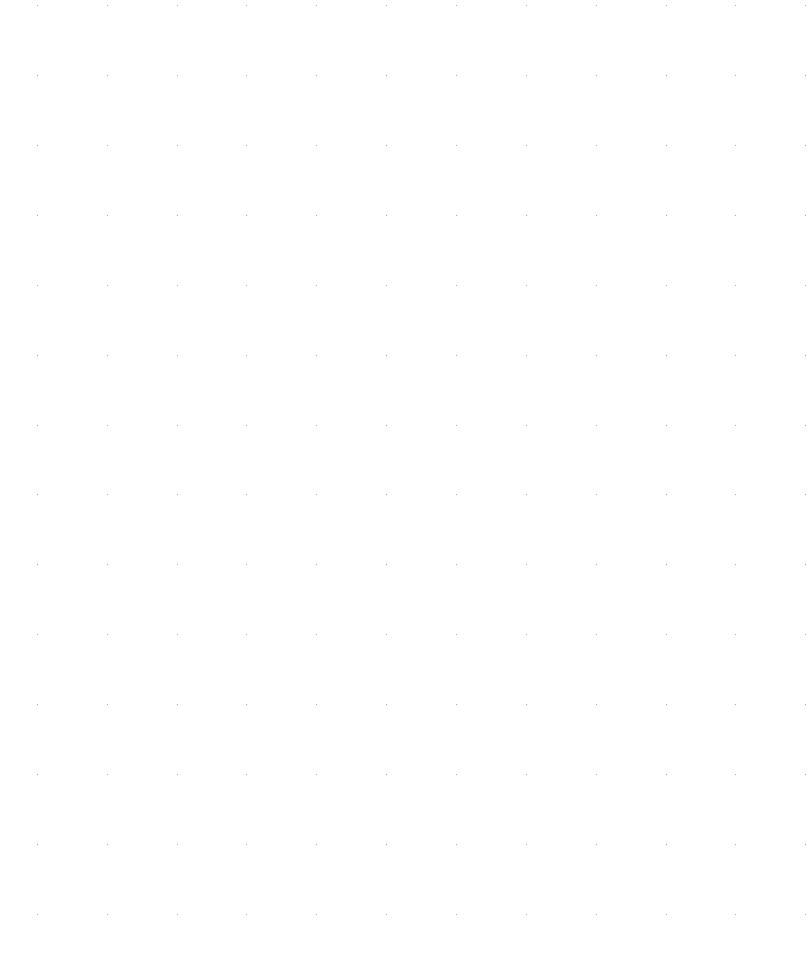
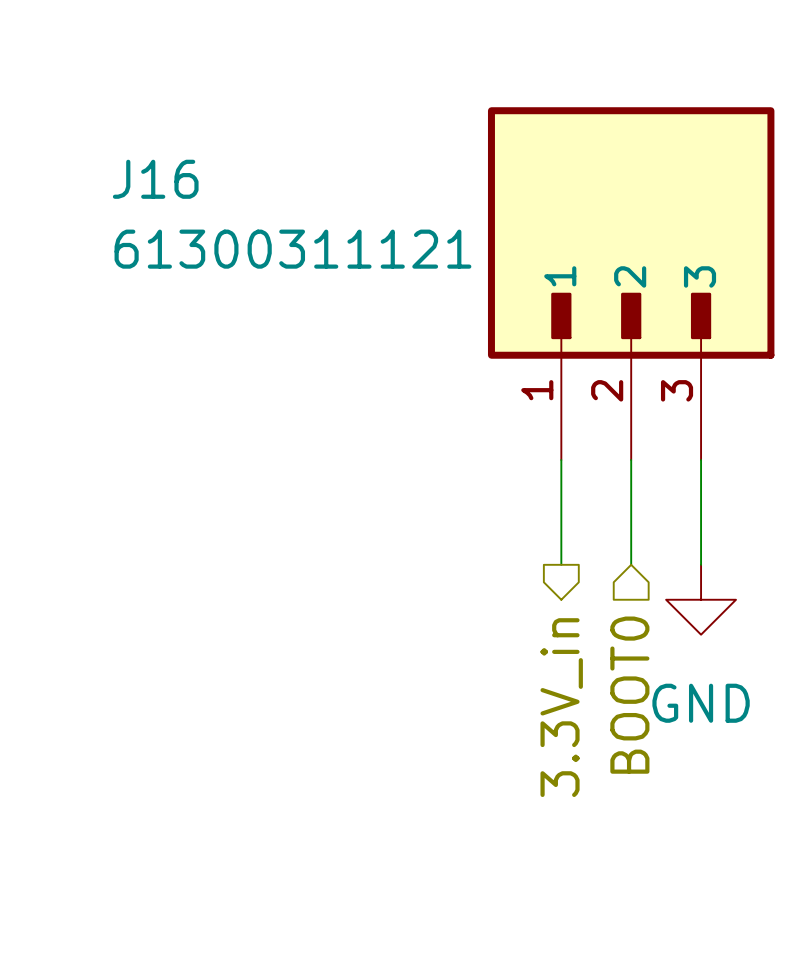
J16: none -> 61300311121 (631, 283)
wire: none -> (561, 460) (561, 564)
wire: none -> (631, 460) (631, 564)
wire: none -> (701, 460) (701, 564)
power symbol: none -> GND (701, 599)
hierarchical label: none -> BOOT0 (629, 695)
hierarchical label: none -> 3.3V_in (561, 707)

